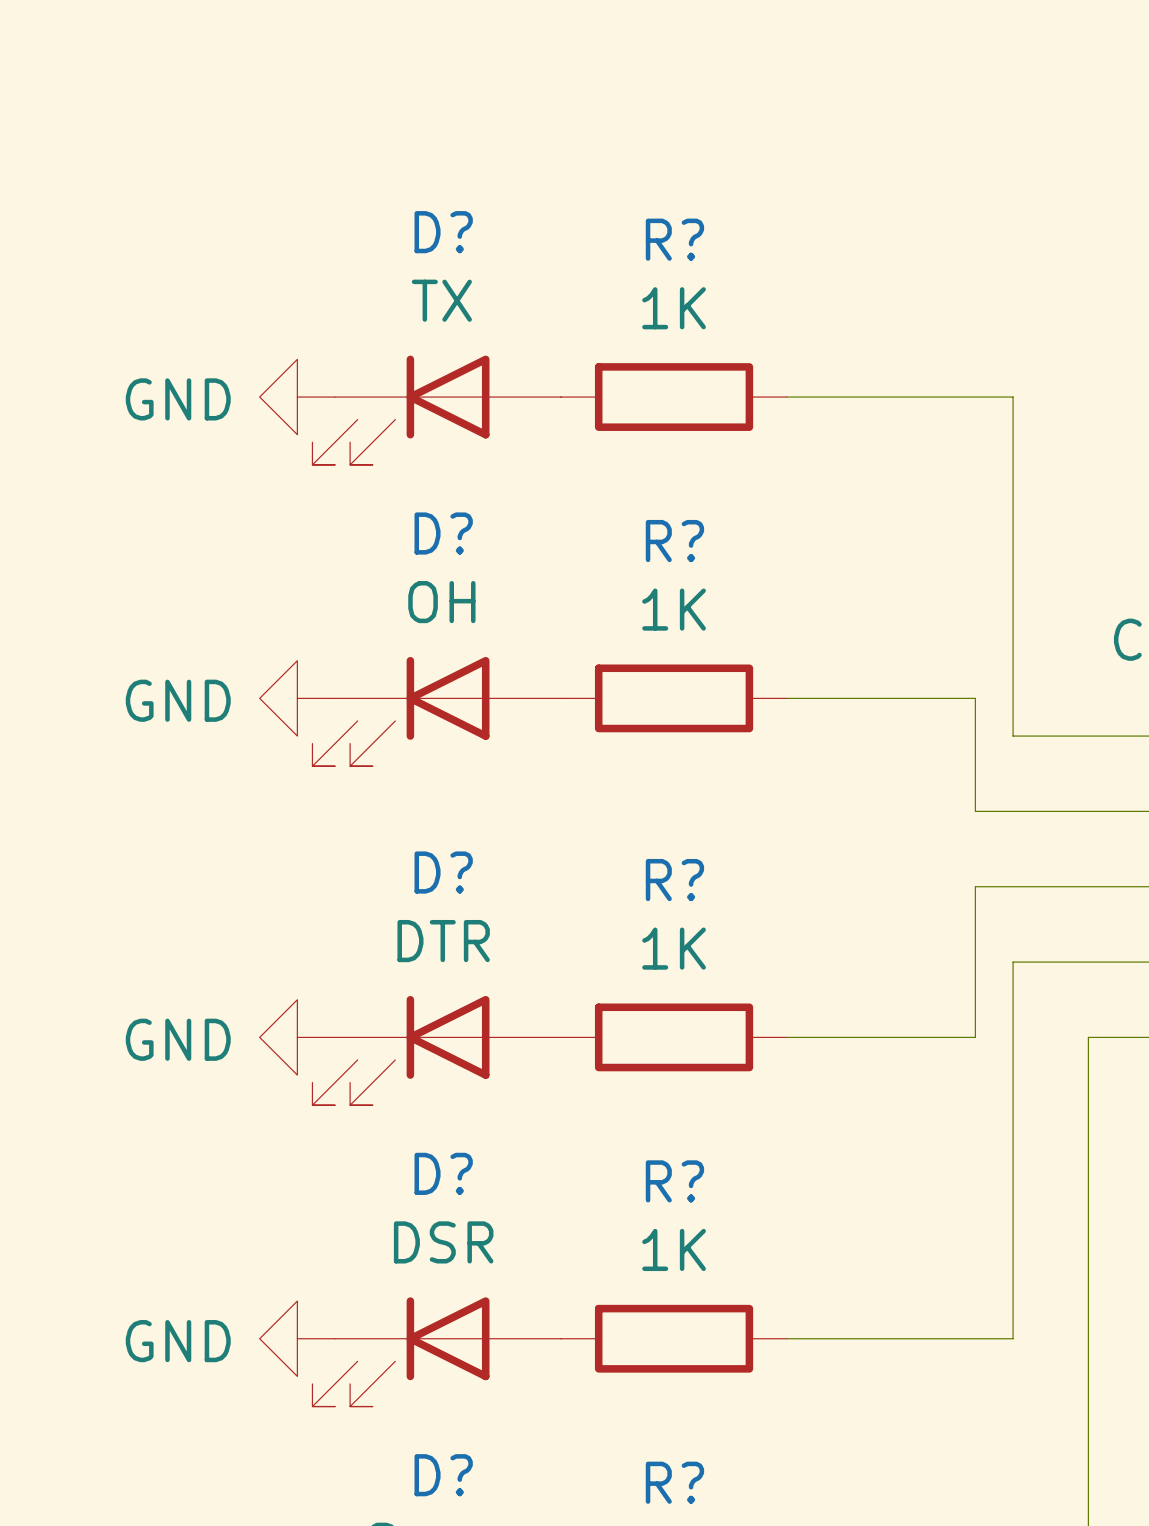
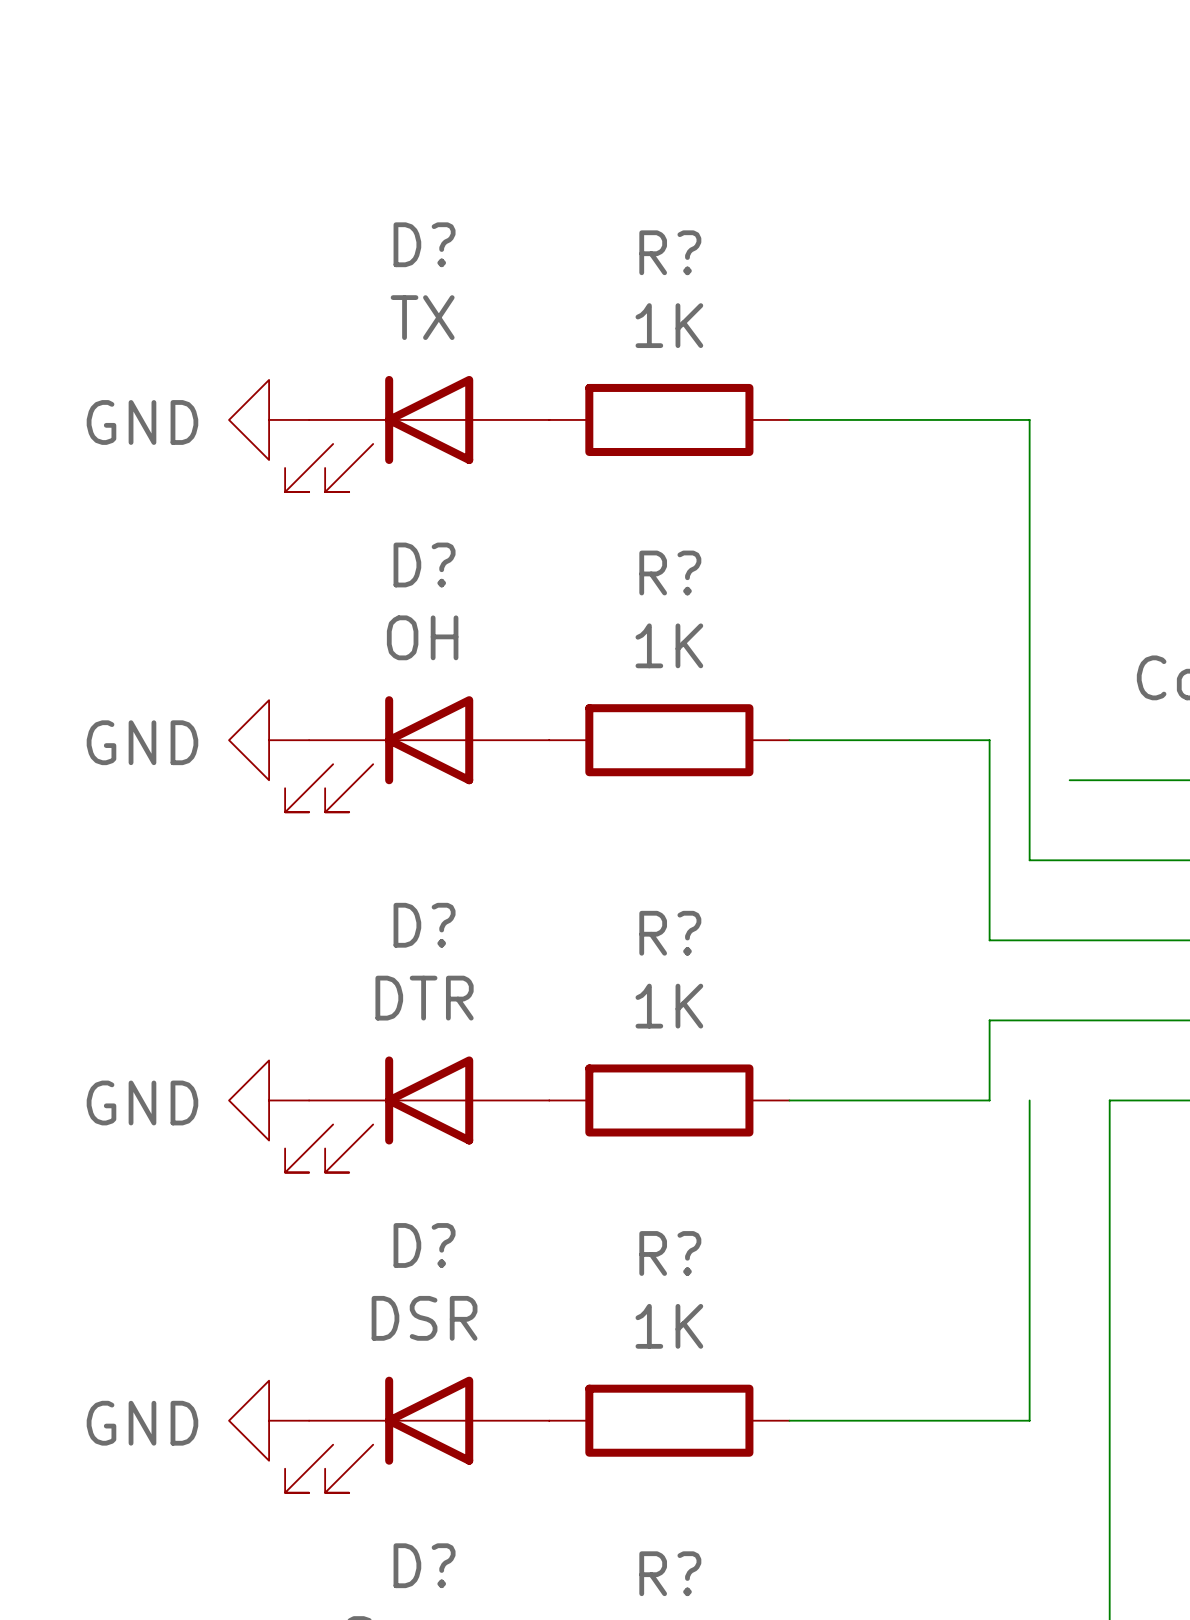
wire: (1013, 736) (1050, 736) -> (1029, 780) (1029, 860)
wire: (975, 811) (1013, 811) -> (989, 860) (989, 940)
wire: (975, 886) (975, 962) -> none
wire: (1013, 962) (1013, 1037) -> (1029, 1020) (989, 1020)

